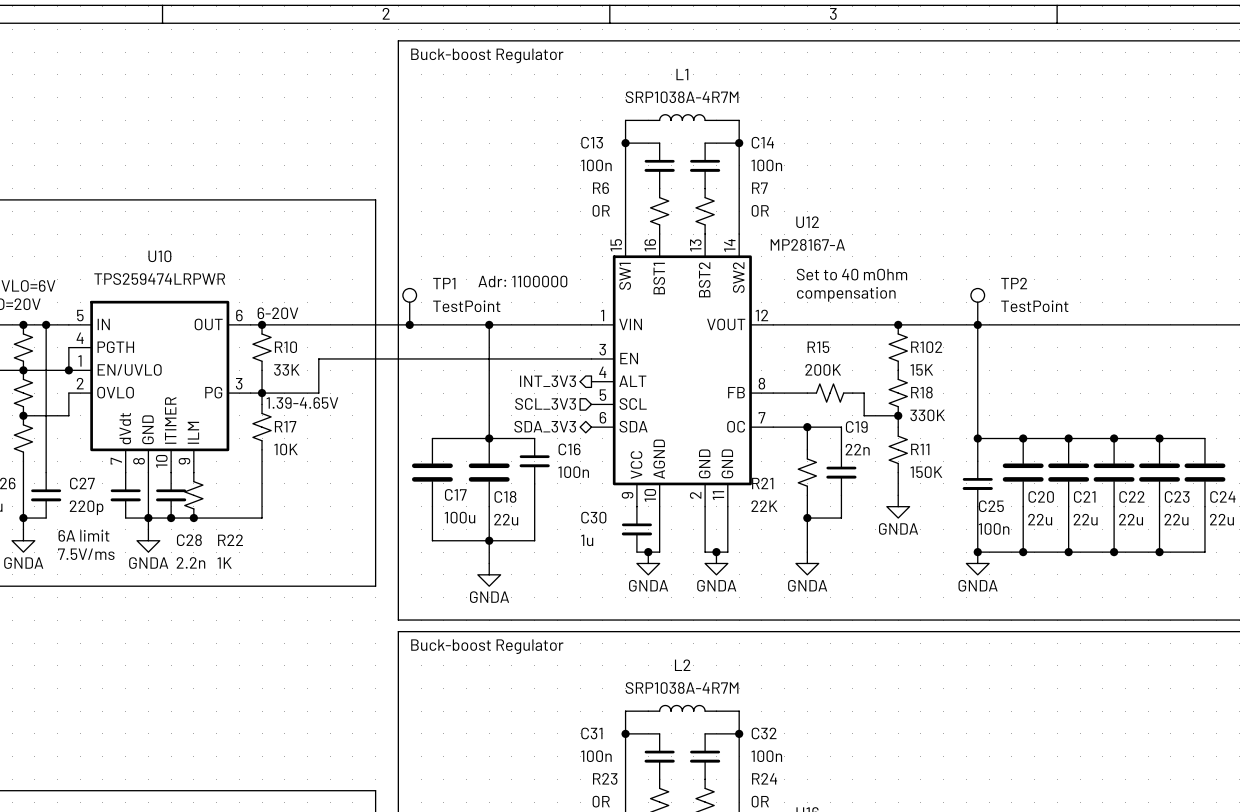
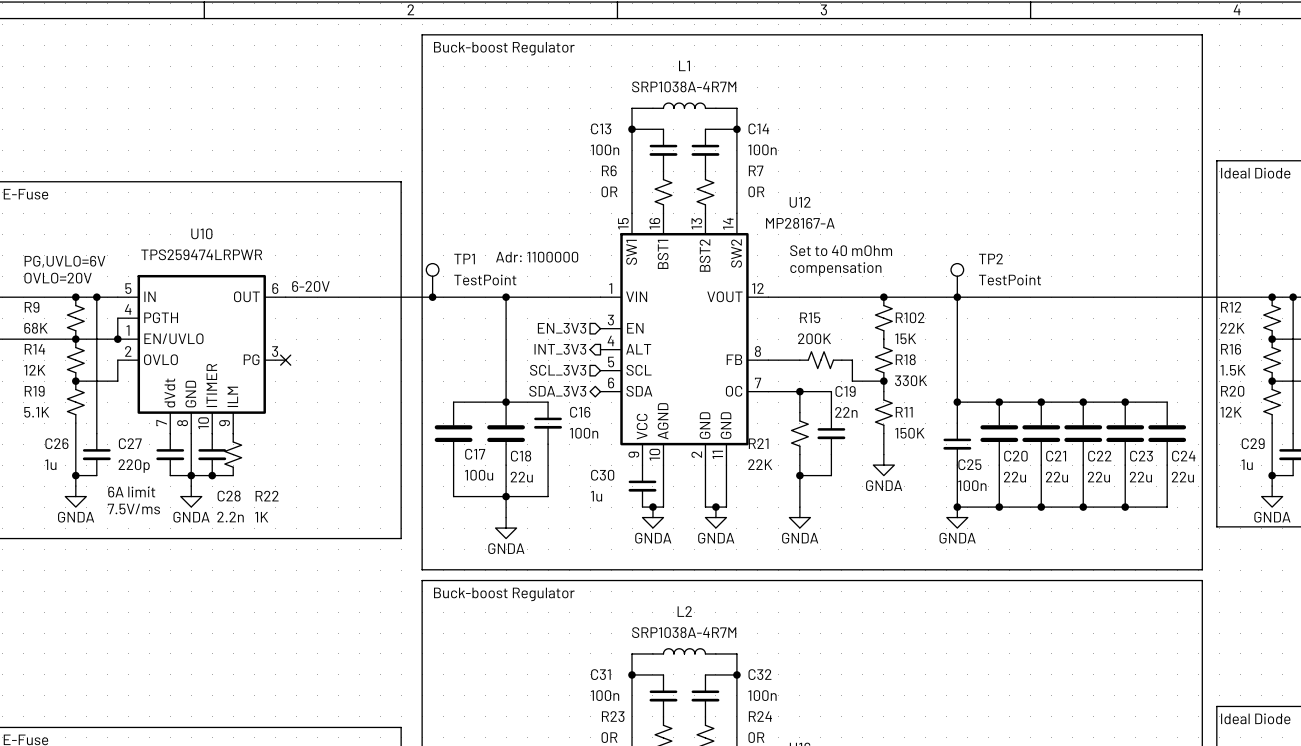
junction: (262, 324) -> none
R10: 33K (262, 347) -> none
hierarchical label: none -> EN_3V3 (562, 328)
wire: (591, 358) (318, 358) (318, 393) (250, 393) -> none
wire: (262, 370) (262, 404) -> none
no-connect mark: none -> (285, 360)
junction: (262, 393) -> none
text: 1.39-4.65V (302, 403) -> none
R17: 10K (262, 427) -> none
wire: (262, 449) (262, 518) (193, 518) -> none
junction: (193, 518) -> none

